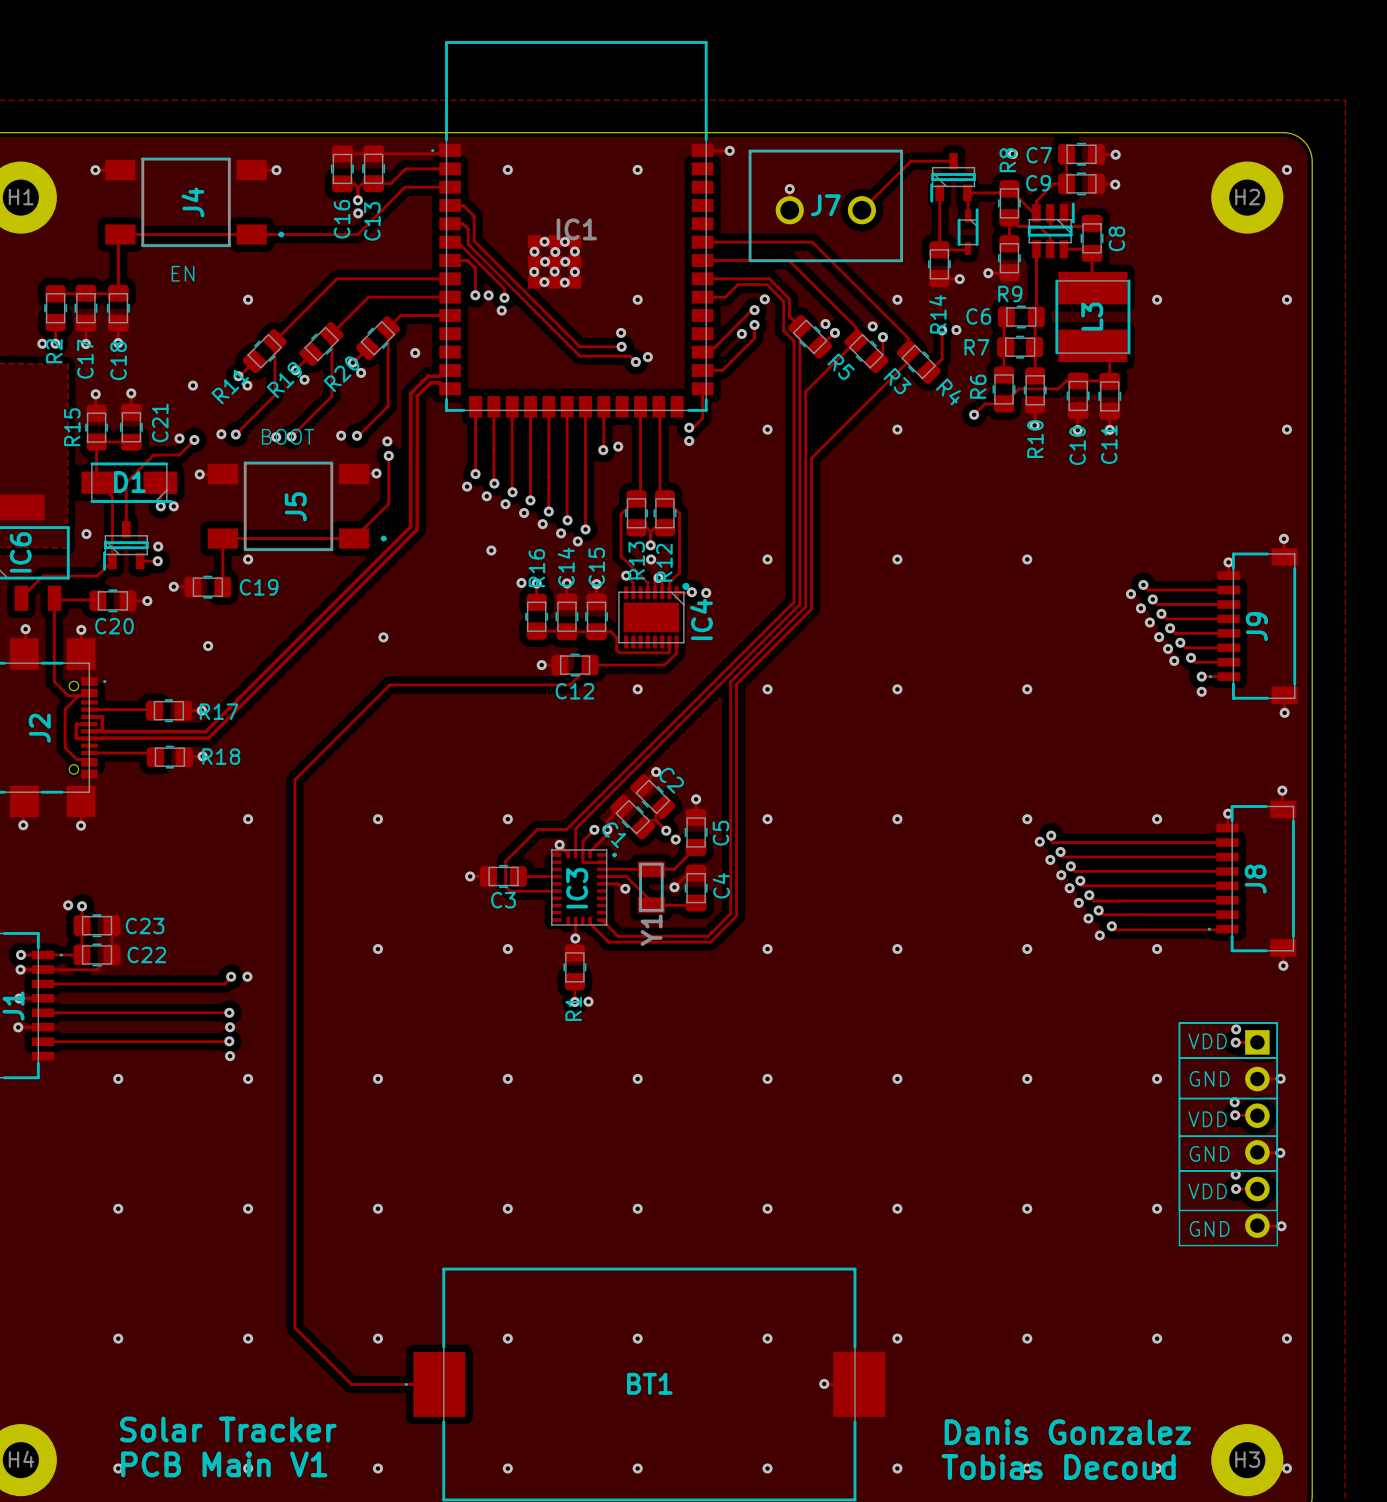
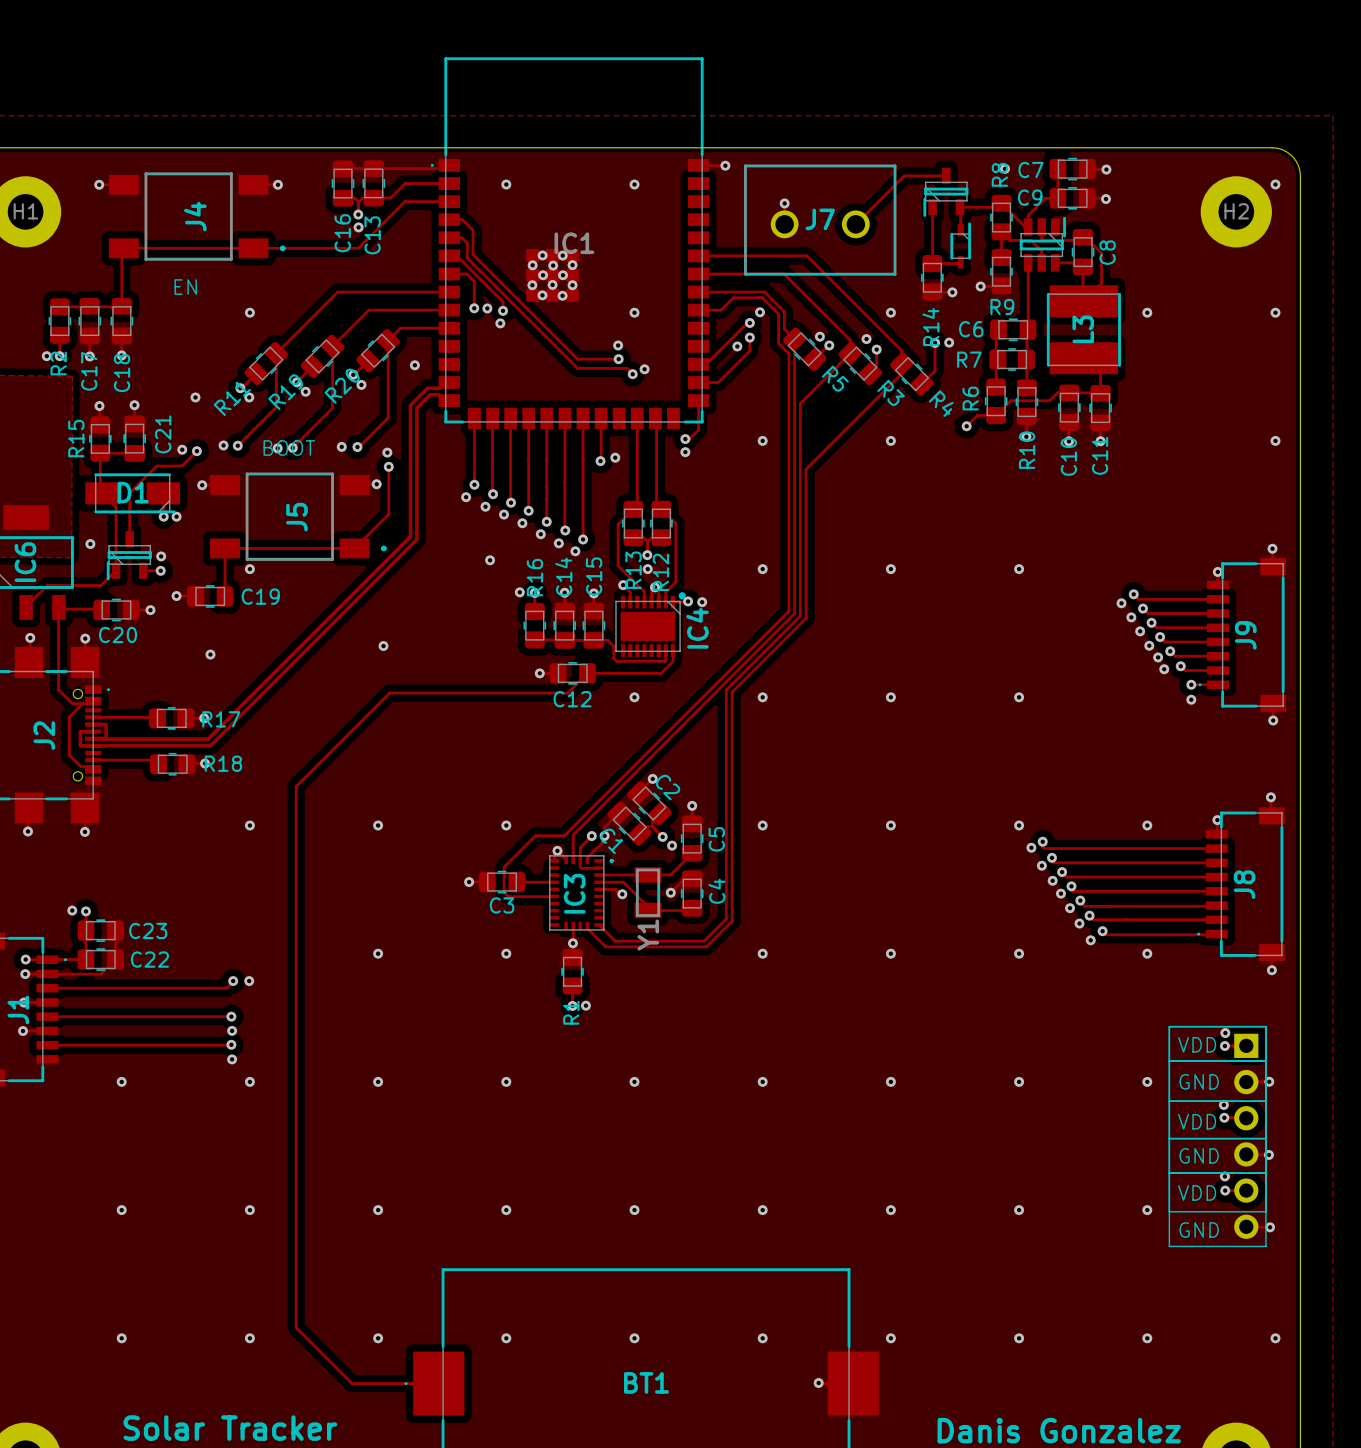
track: none -> (1083, 237) (1085, 237) (1101, 253) (1101, 283) (1083, 301)

